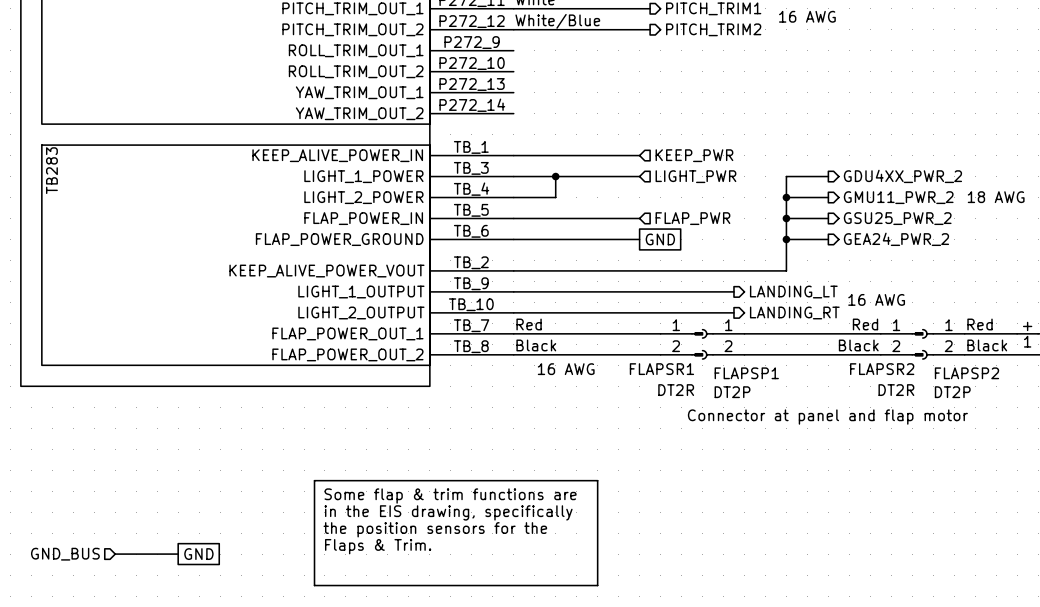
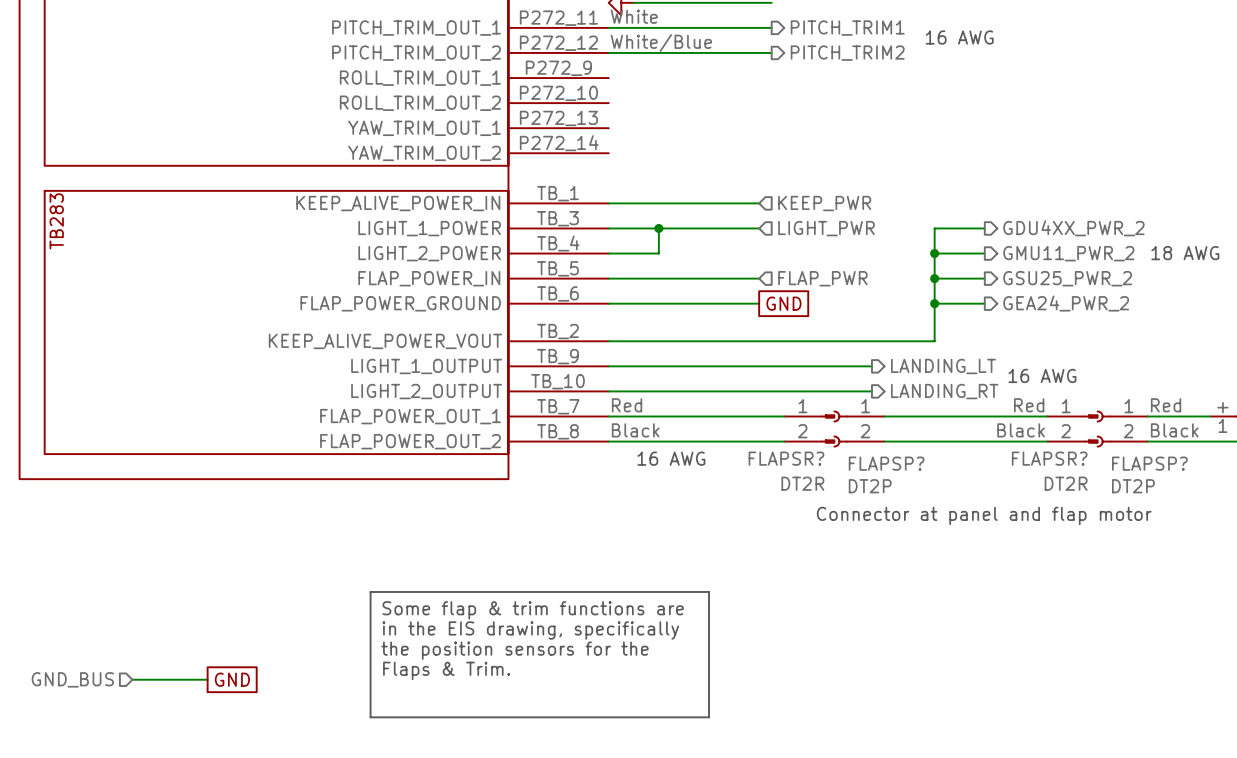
FLAPSR1 name: FLAPSR1 (661, 369) -> FLAPSR? (786, 458)
FLAPSR2 name: FLAPSR2 (882, 369) -> FLAPSR? (1049, 458)
FLAPSP1 name: FLAPSP1 (746, 373) -> FLAPSP? (886, 463)
FLAPSP2 name: FLAPSP2 (966, 373) -> FLAPSP? (1149, 463)

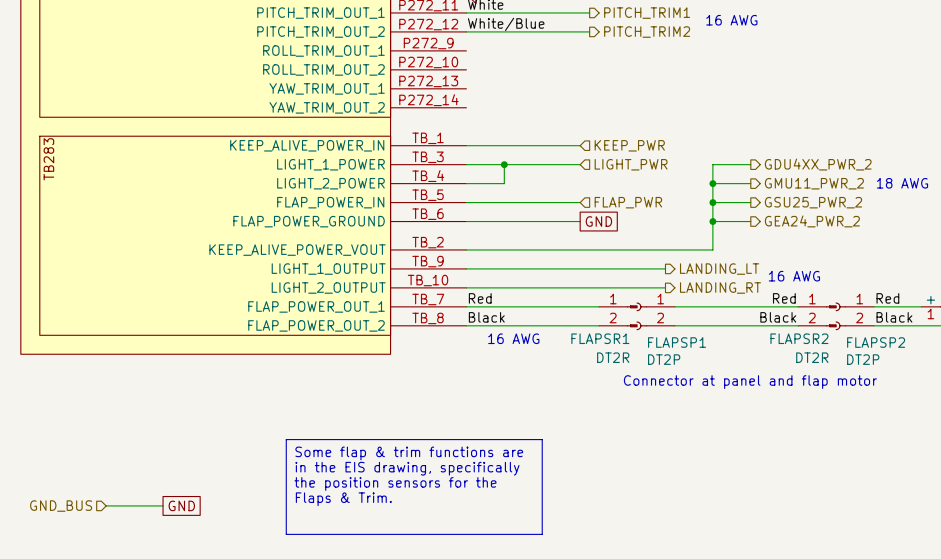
FLAPSR? name: FLAPSR? (786, 458) -> FLAPSR1 (600, 338)
FLAPSR? name: FLAPSR? (1049, 458) -> FLAPSR2 (799, 338)
FLAPSP? name: FLAPSP? (886, 463) -> FLAPSP1 (677, 342)
FLAPSP? name: FLAPSP? (1149, 463) -> FLAPSP2 (876, 342)

